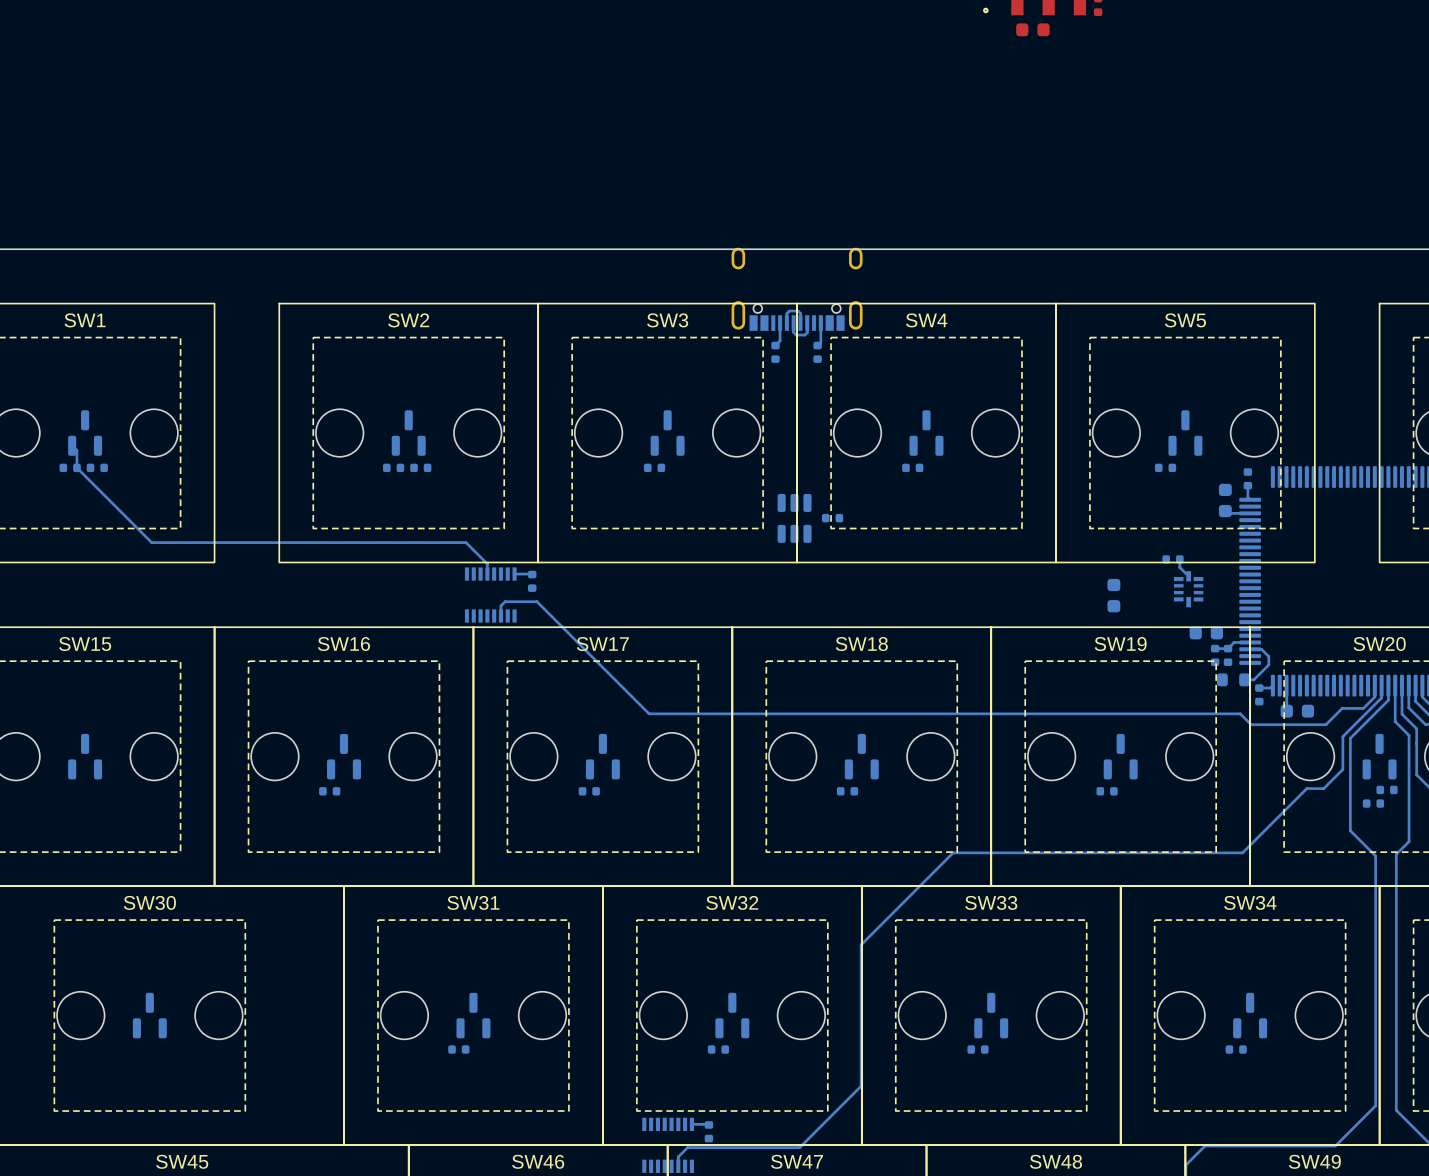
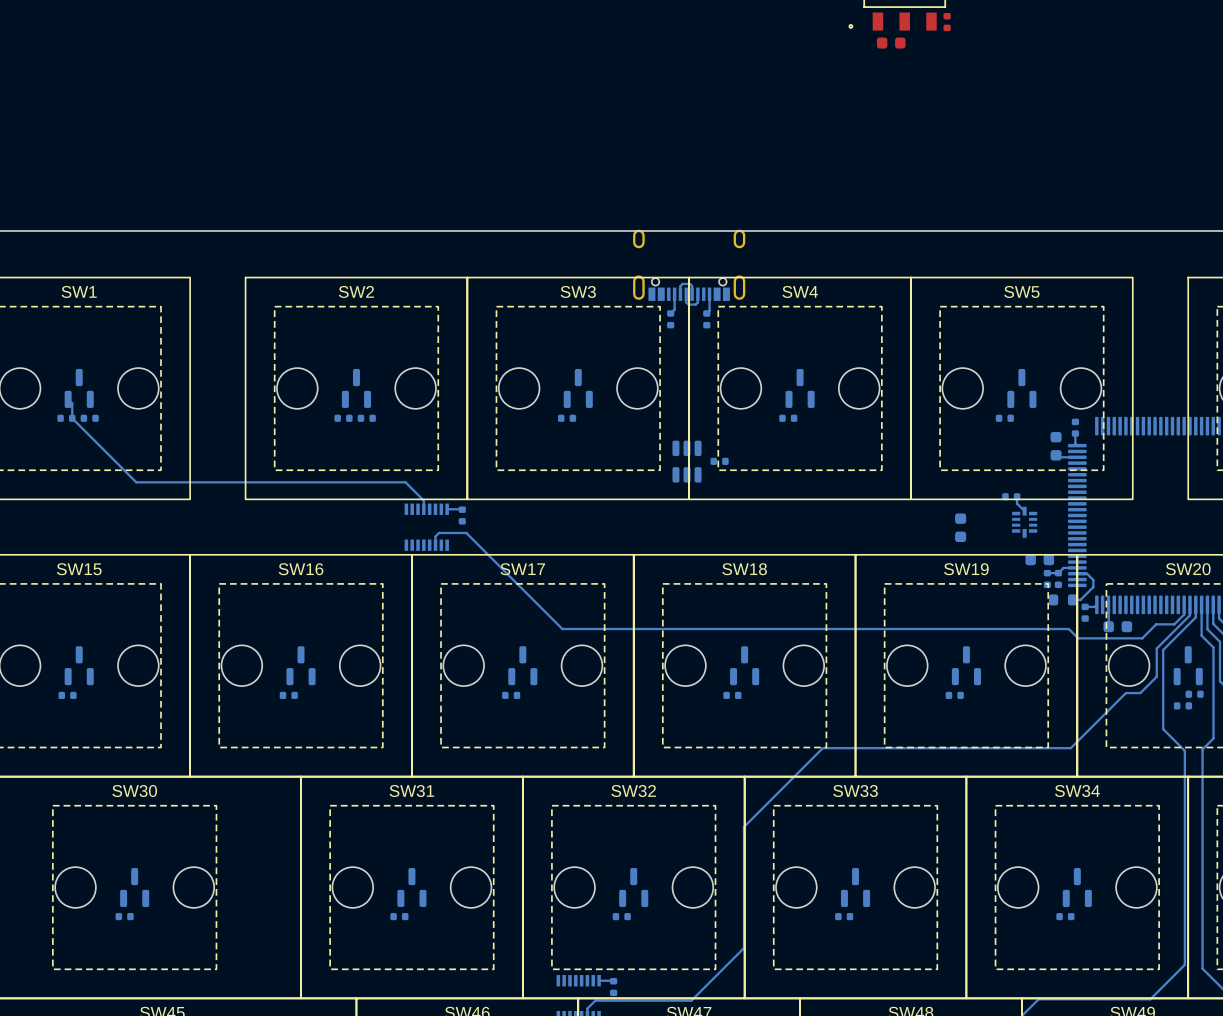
part: none -> (67, 695)
part: none -> (124, 916)

